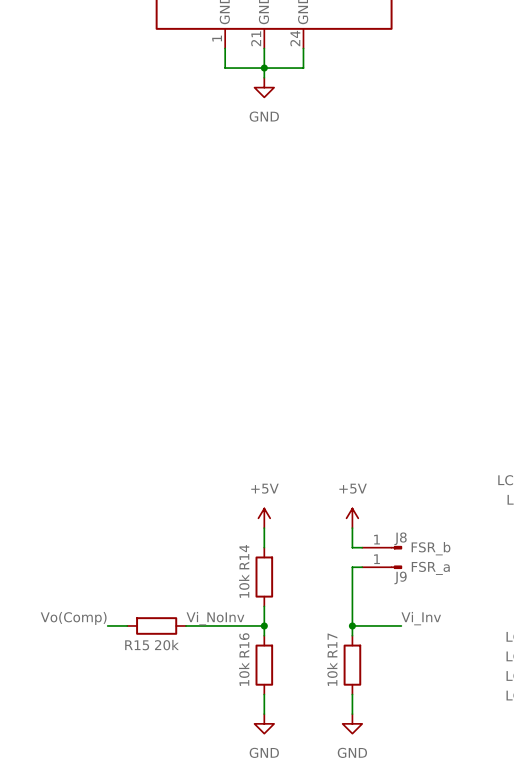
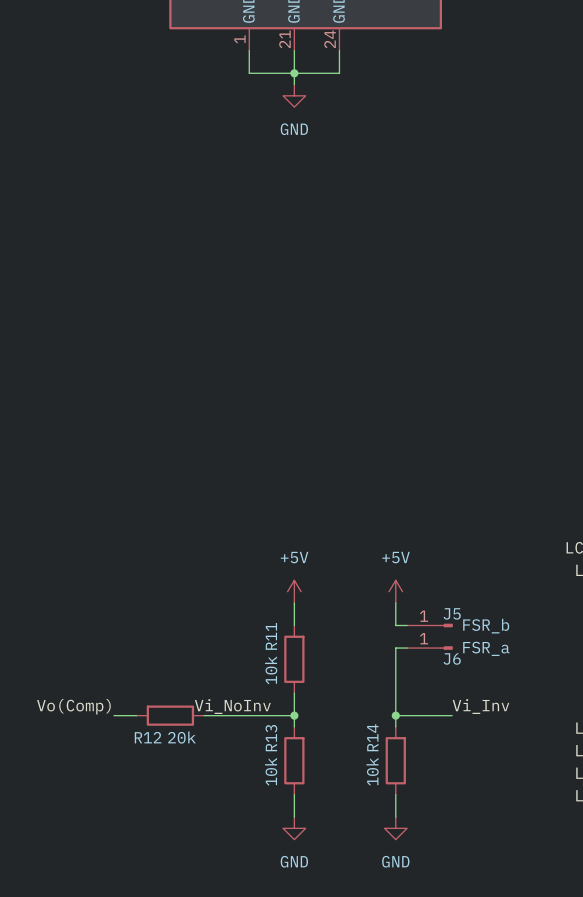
J8 name: J8 (400, 538) -> J5 (452, 613)
R14 name: R14 (244, 557) -> R11 (271, 636)
J9 name: J9 (400, 577) -> J6 (452, 658)
R15 name: R15 (137, 645) -> R12 (148, 737)
R16 name: R16 (244, 645) -> R13 (271, 738)
R17 name: R17 (332, 645) -> R14 (372, 737)

